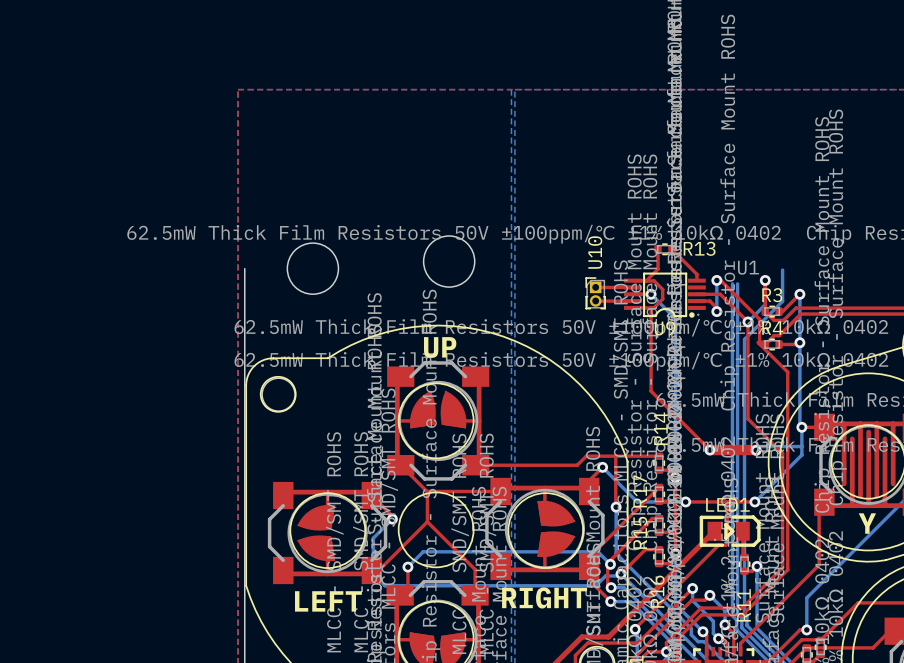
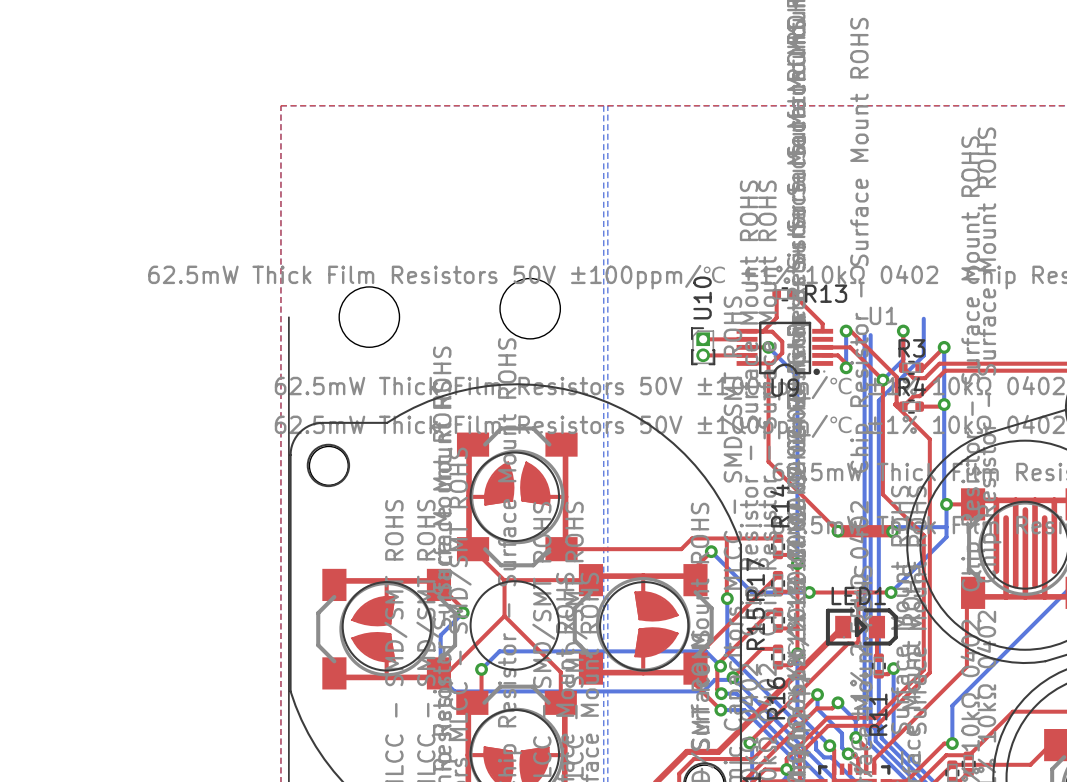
text: UP (440, 347) -> none
text: Y (867, 523) -> none
text: RIGHT (544, 597) -> none
text: LEFT (328, 601) -> none

